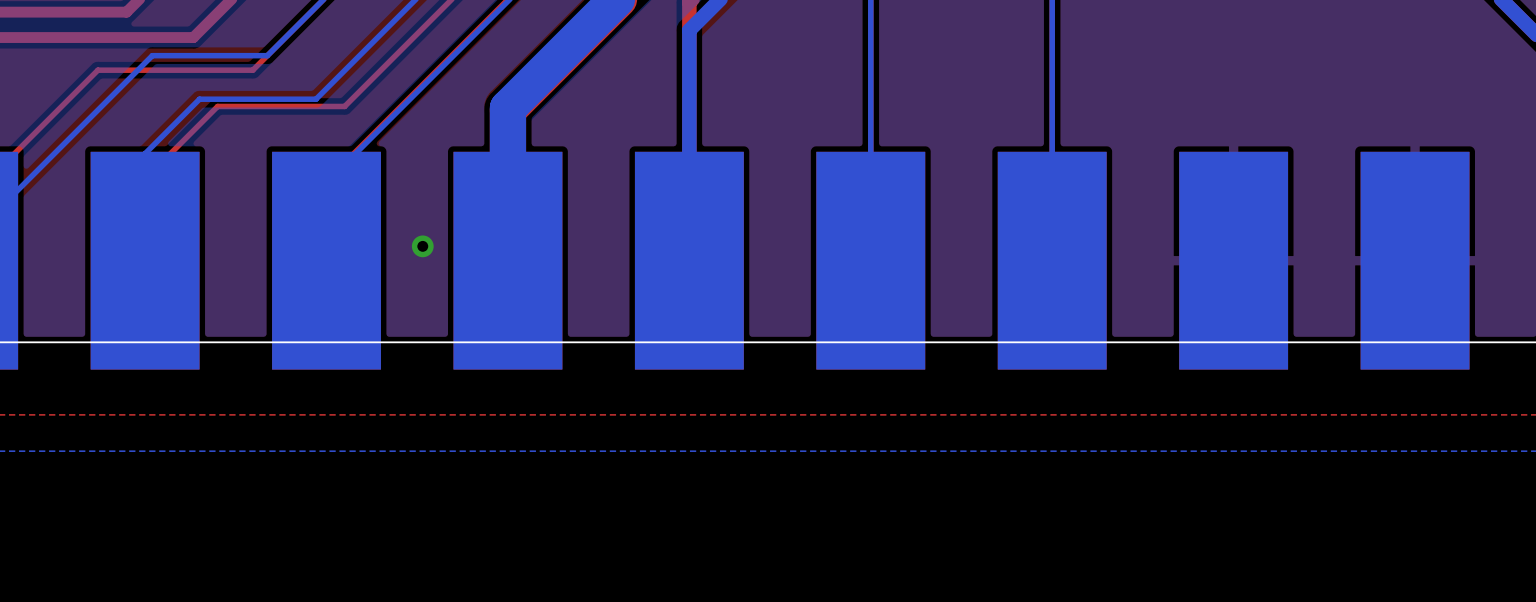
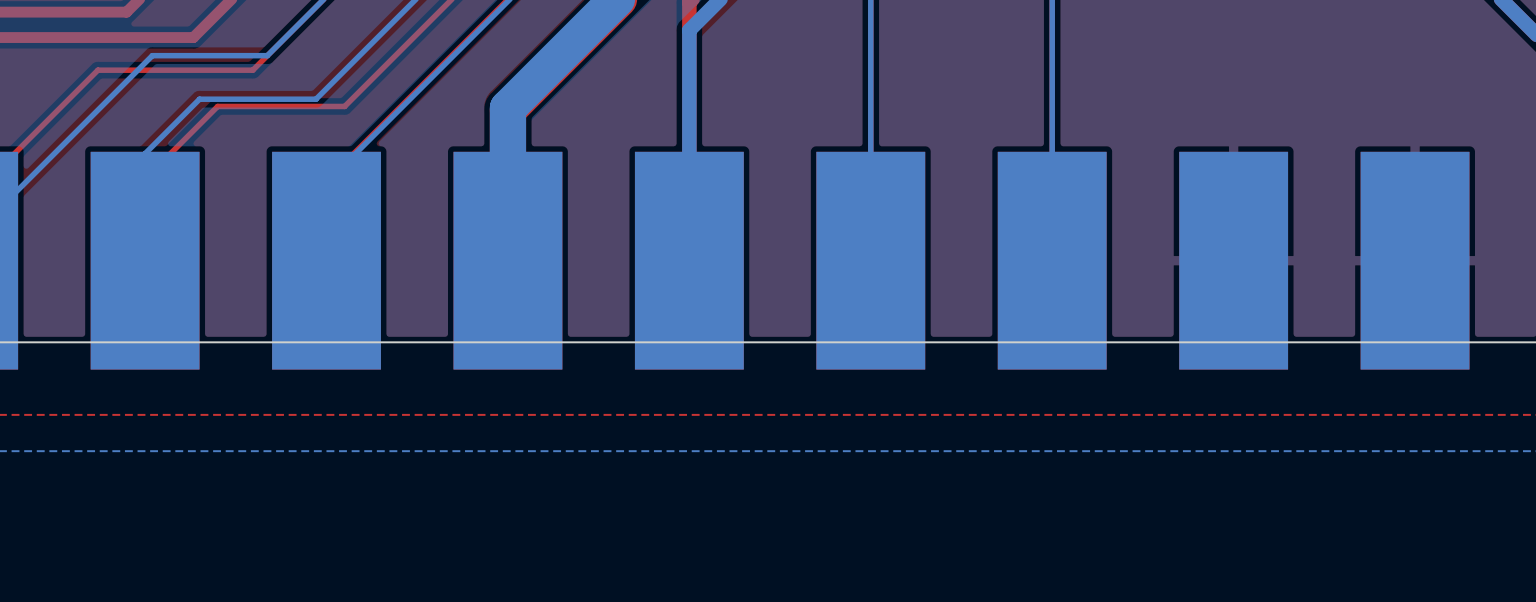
via: (422, 246) -> none

